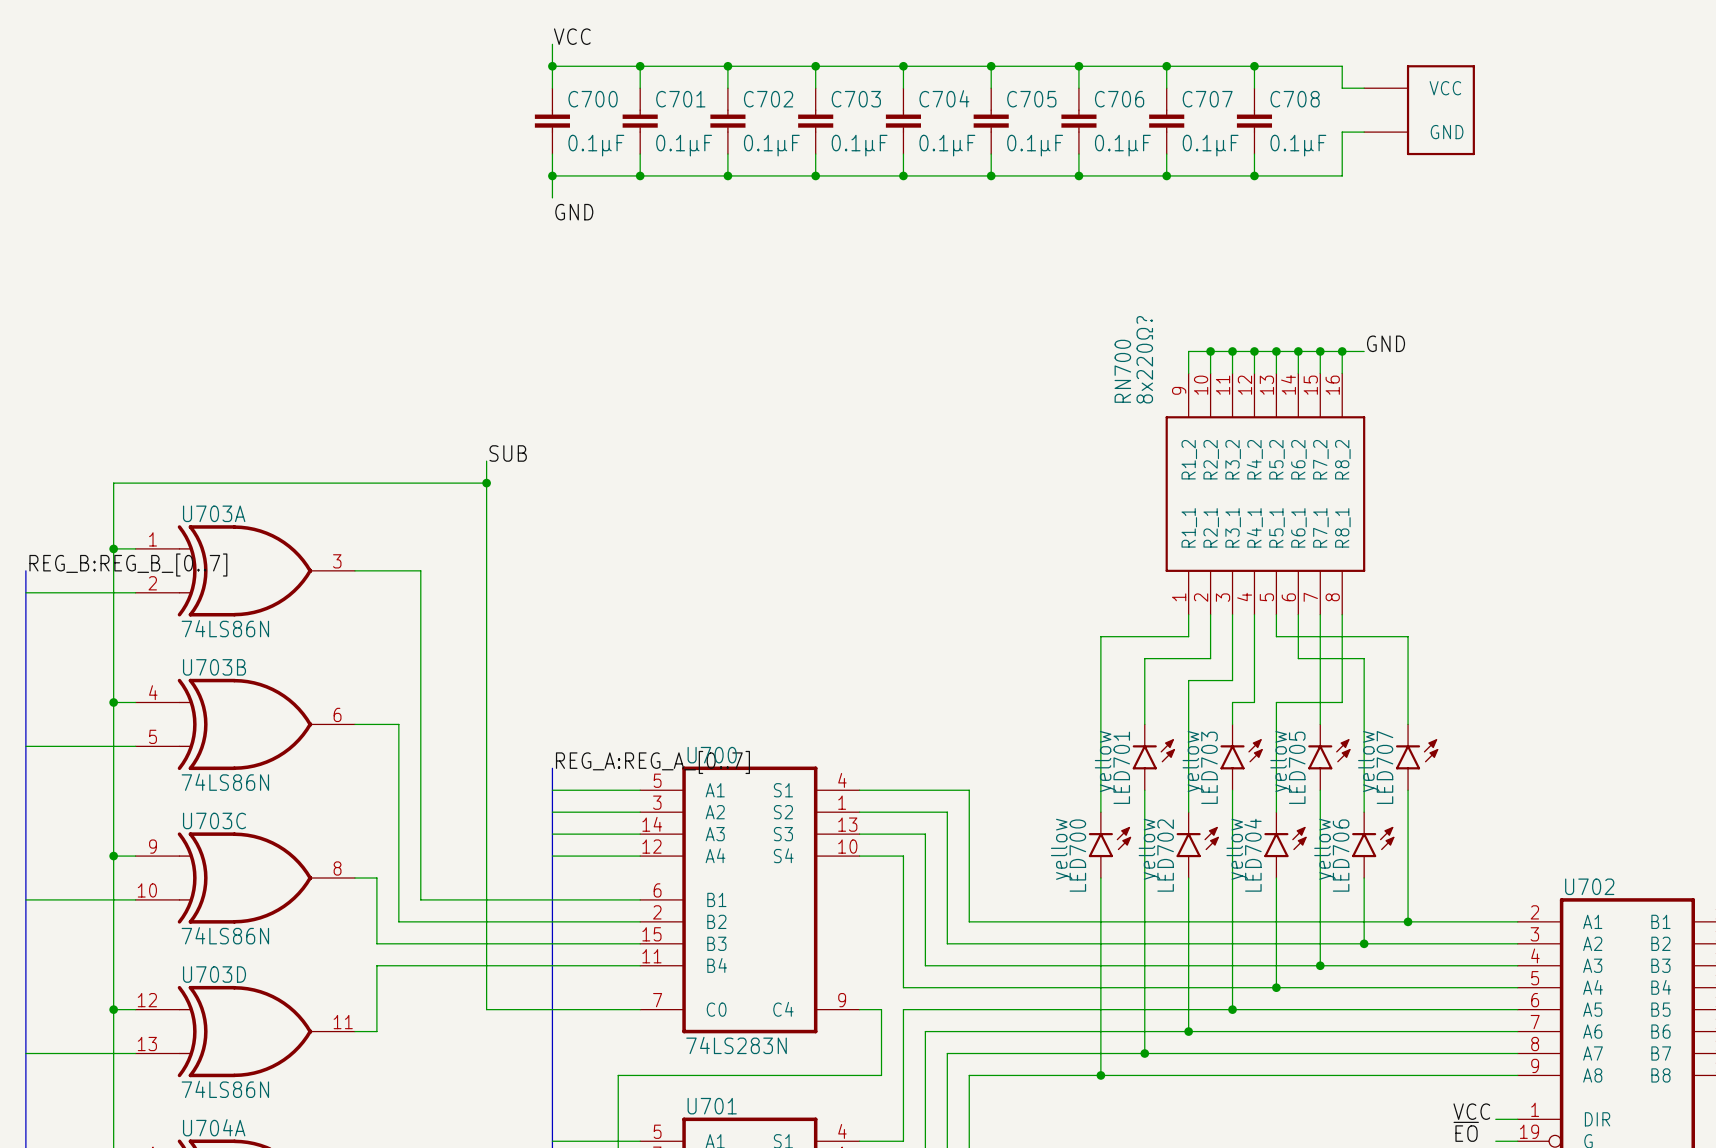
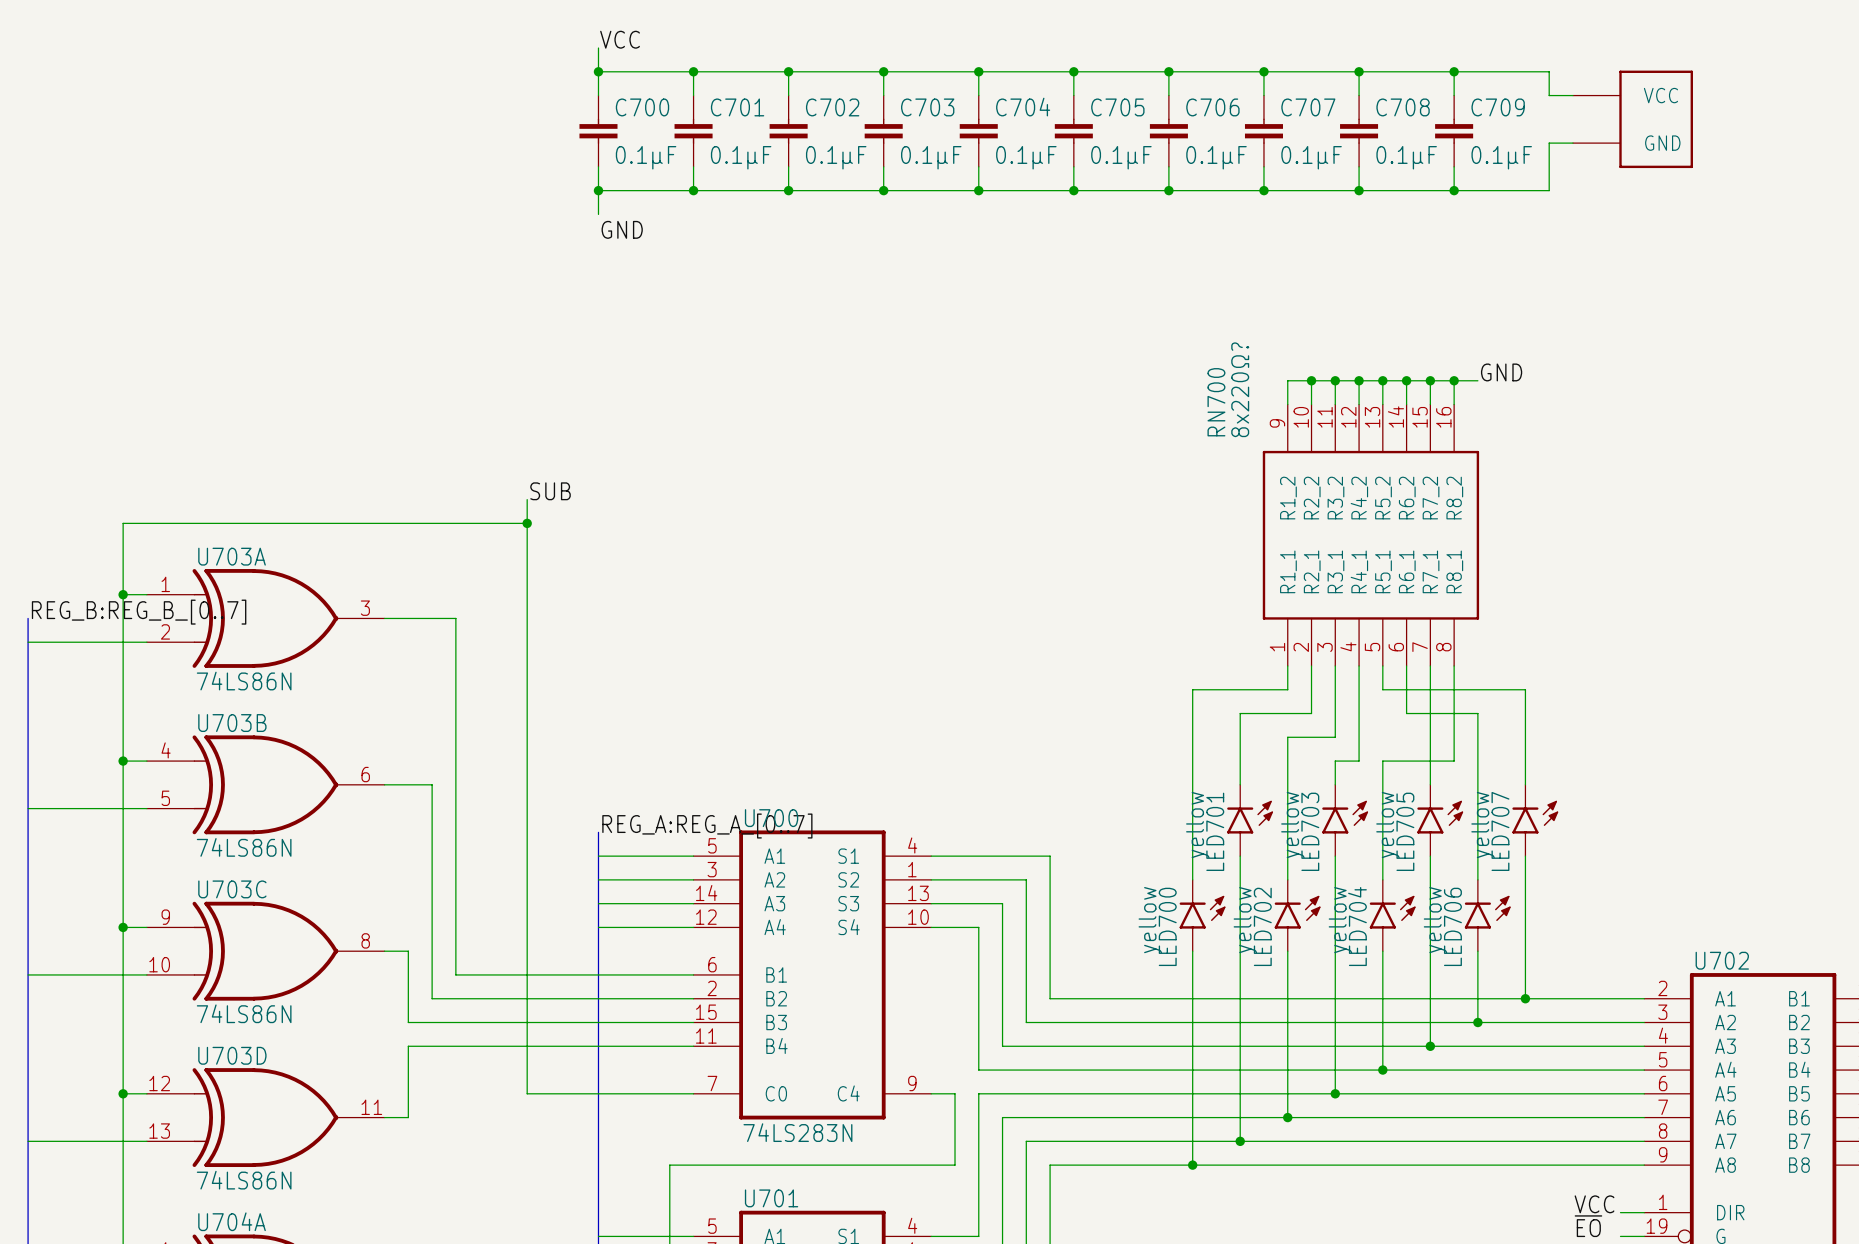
wire: none -> (1454, 71) (1549, 71) (1549, 95) (1572, 95)
junction: none -> (1454, 71)
wire: (1342, 88) (1364, 88) -> none
power symbol position: (1419, 110) -> (1632, 119)
C709: none -> 0.1µF (1454, 131)
wire: (1364, 132) (1342, 132) (1342, 154) -> none
wire: none -> (1572, 143) (1549, 143) (1549, 190) (1454, 190)
junction: none -> (1454, 190)

